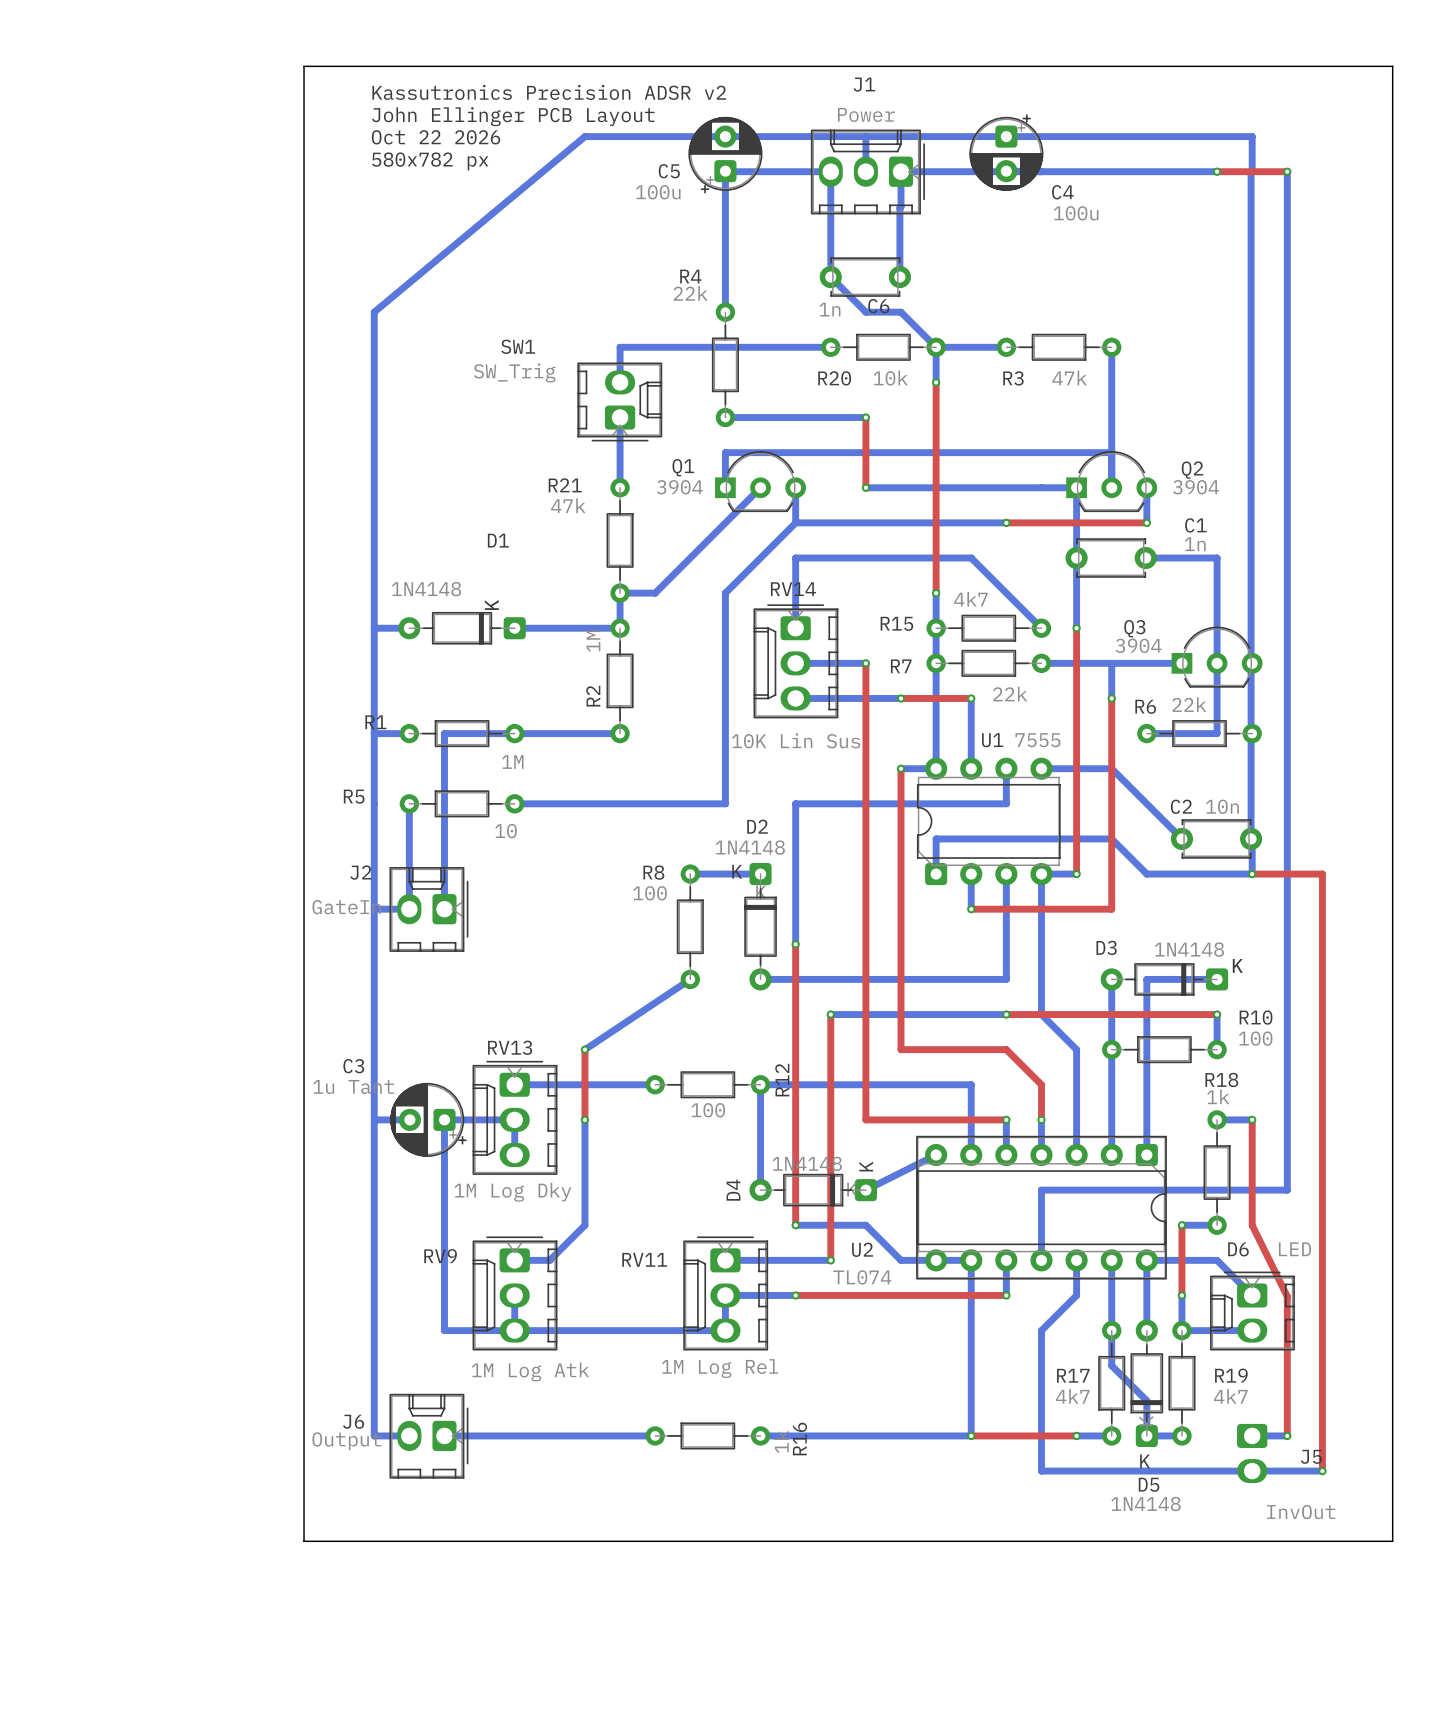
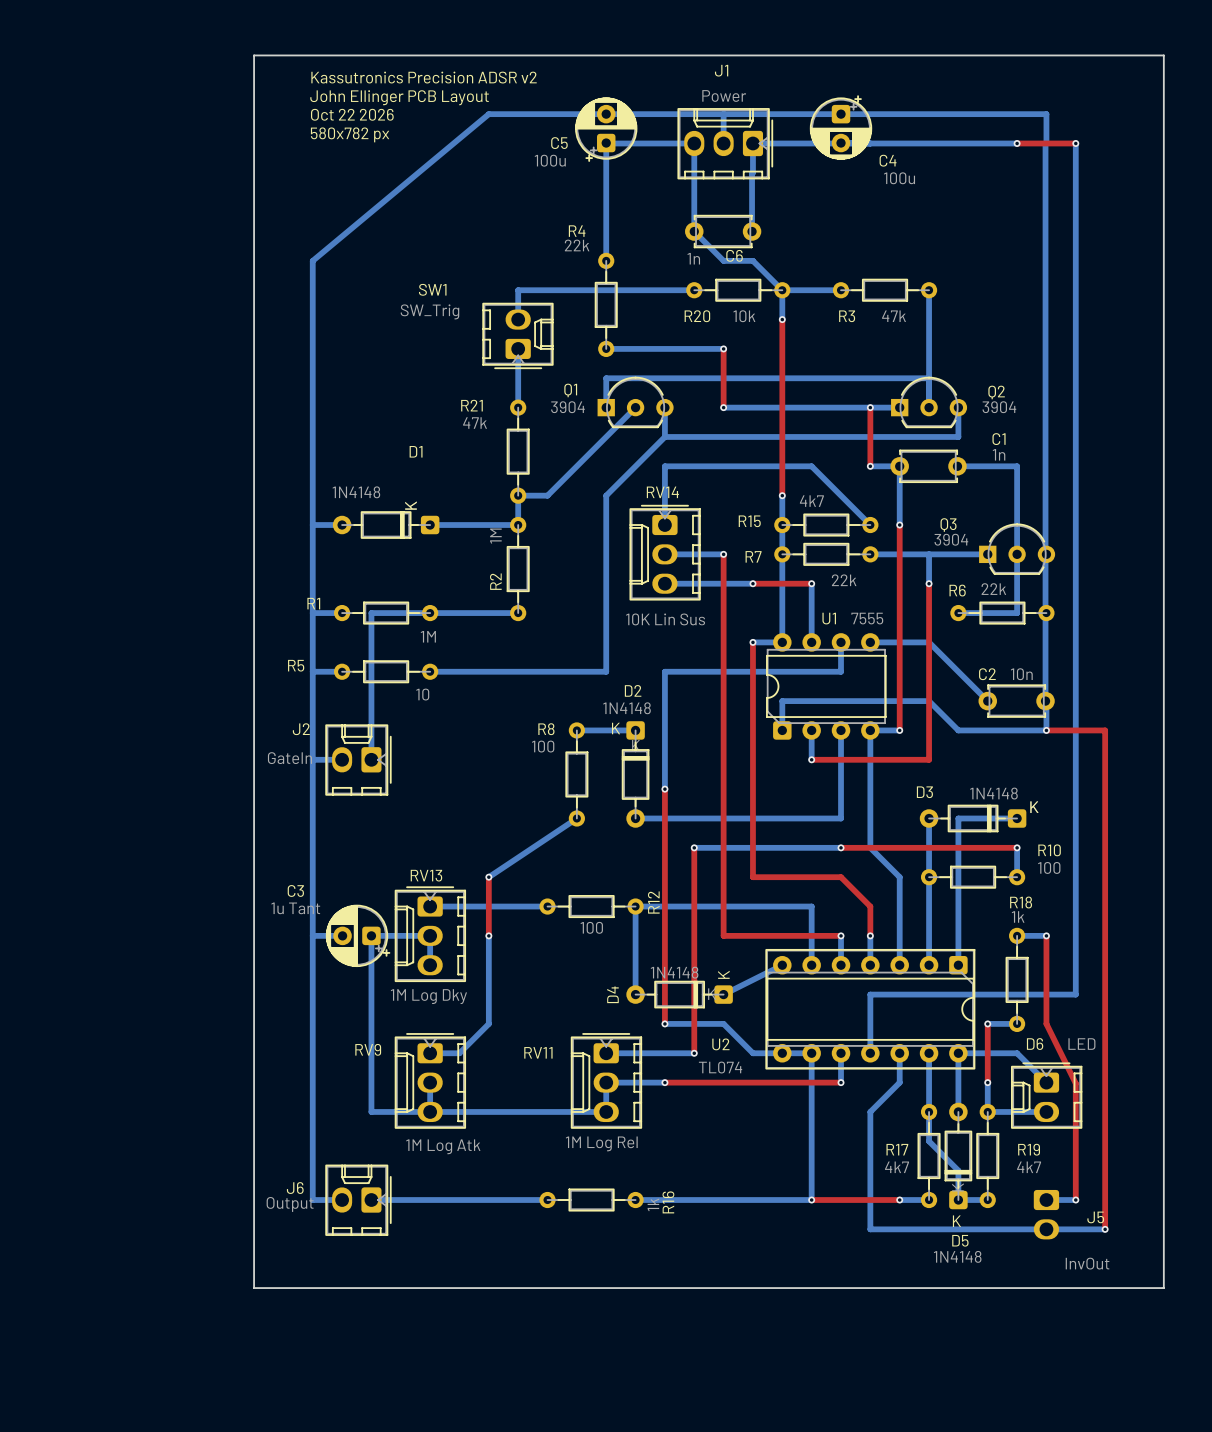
top track: none -> (870, 407) (870, 466)
via: none -> (870, 407)
bottom track: (1076, 487) (1076, 558) -> (870, 466) (899, 466)
bottom track: none -> (841, 436) (958, 436)
top track: (1006, 522) (1146, 522) -> none
via: (1006, 522) -> none
via: (1146, 522) -> none
via: none -> (870, 466)
bottom track: (409, 803) (409, 909) -> (342, 671) (312, 671)

